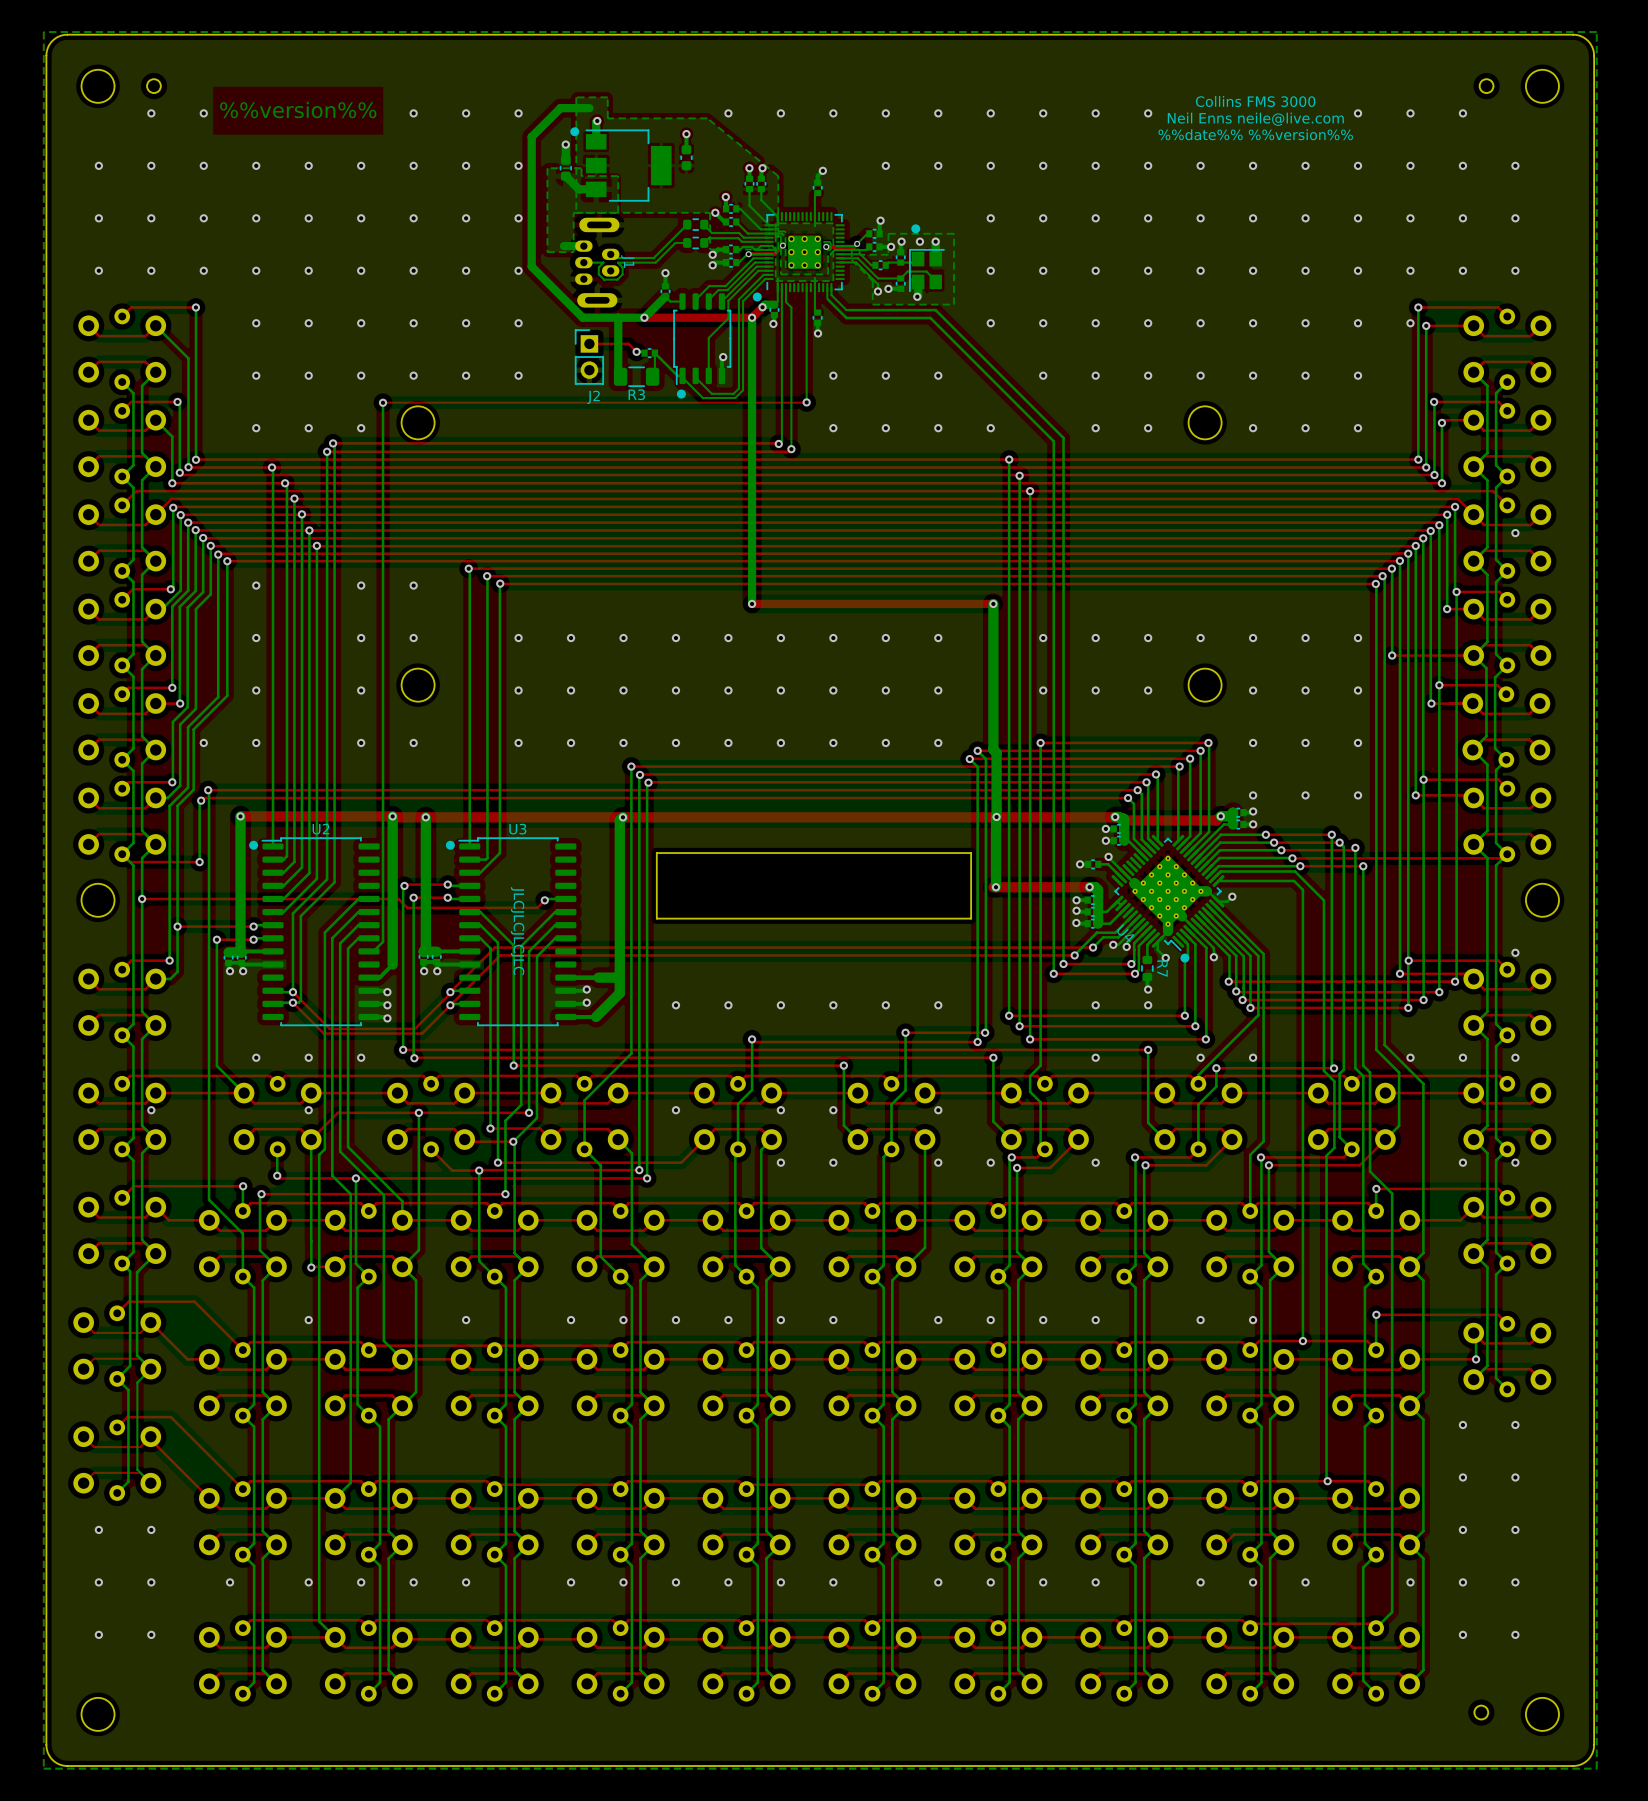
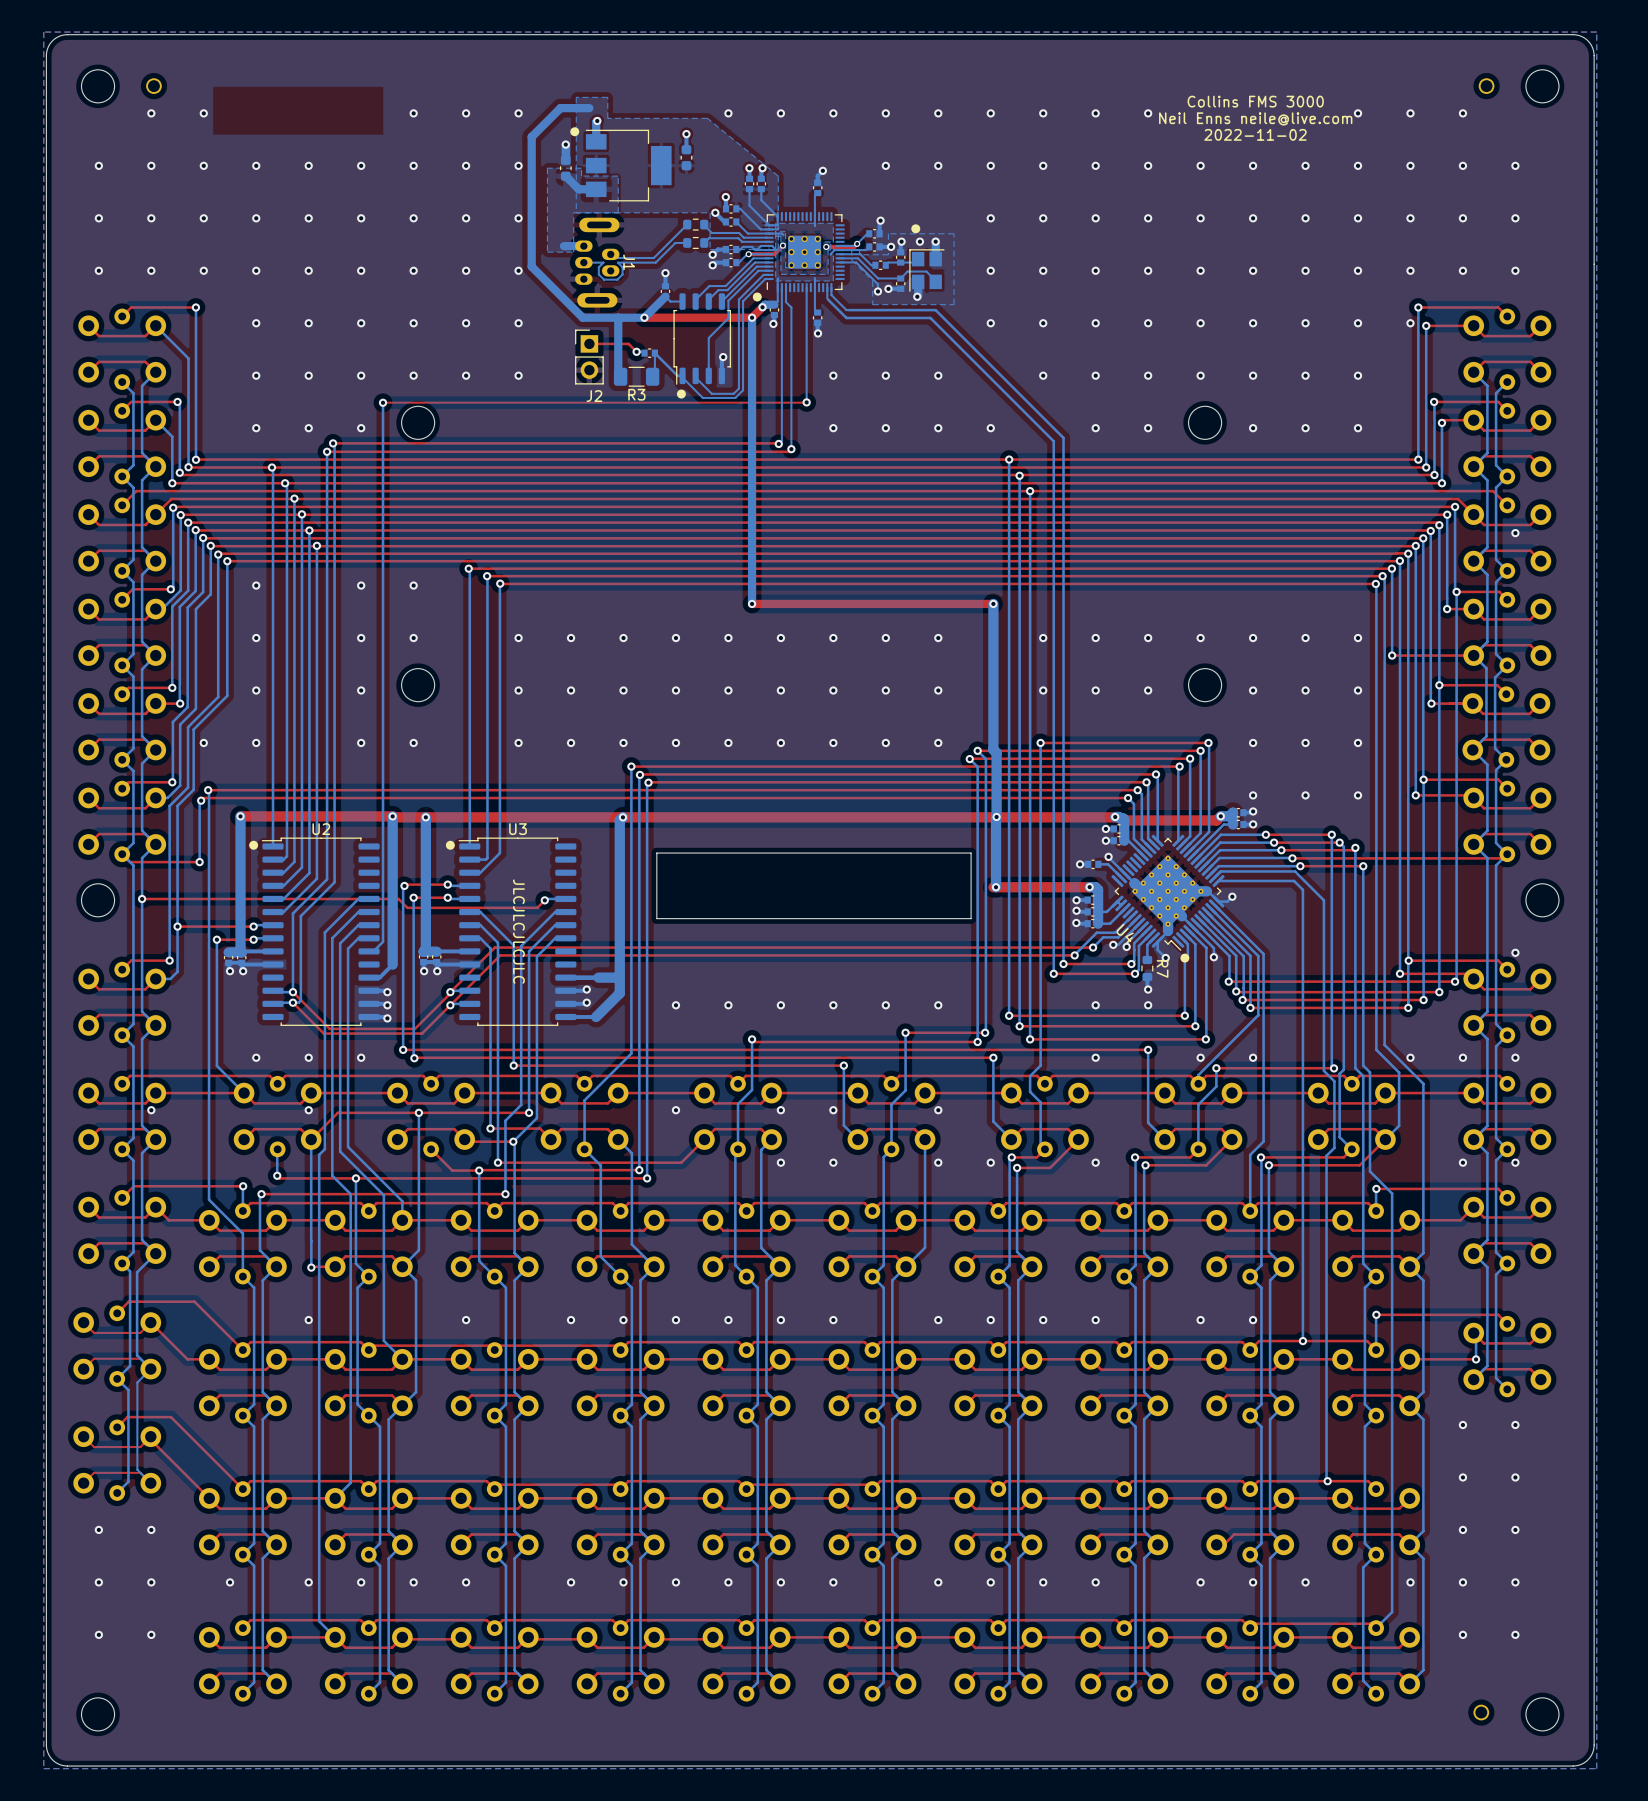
text: %%version%% (298, 110) -> none
text: %%date%% %%version%% (1255, 134) -> 2022-11-02 (1255, 134)

